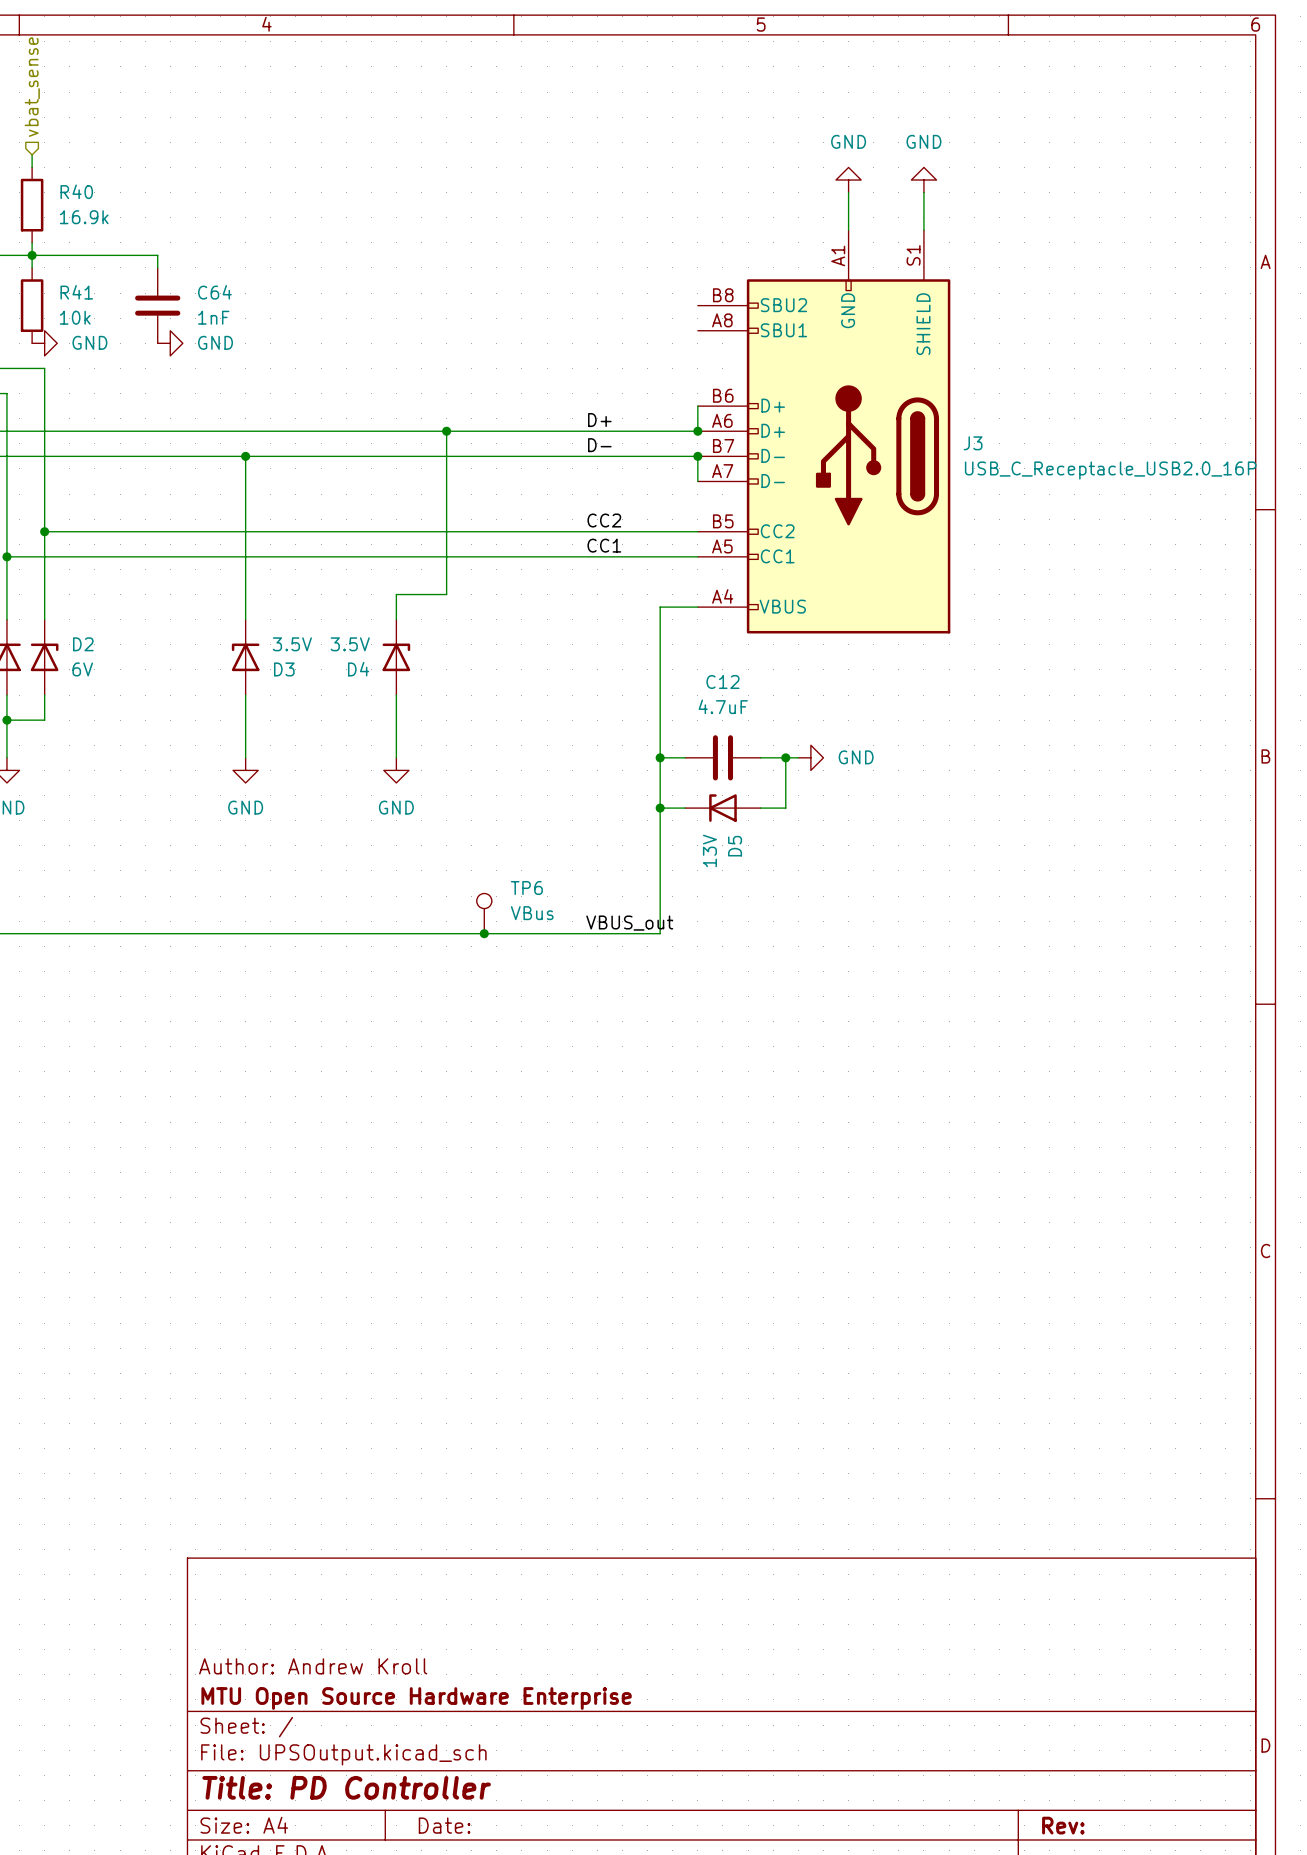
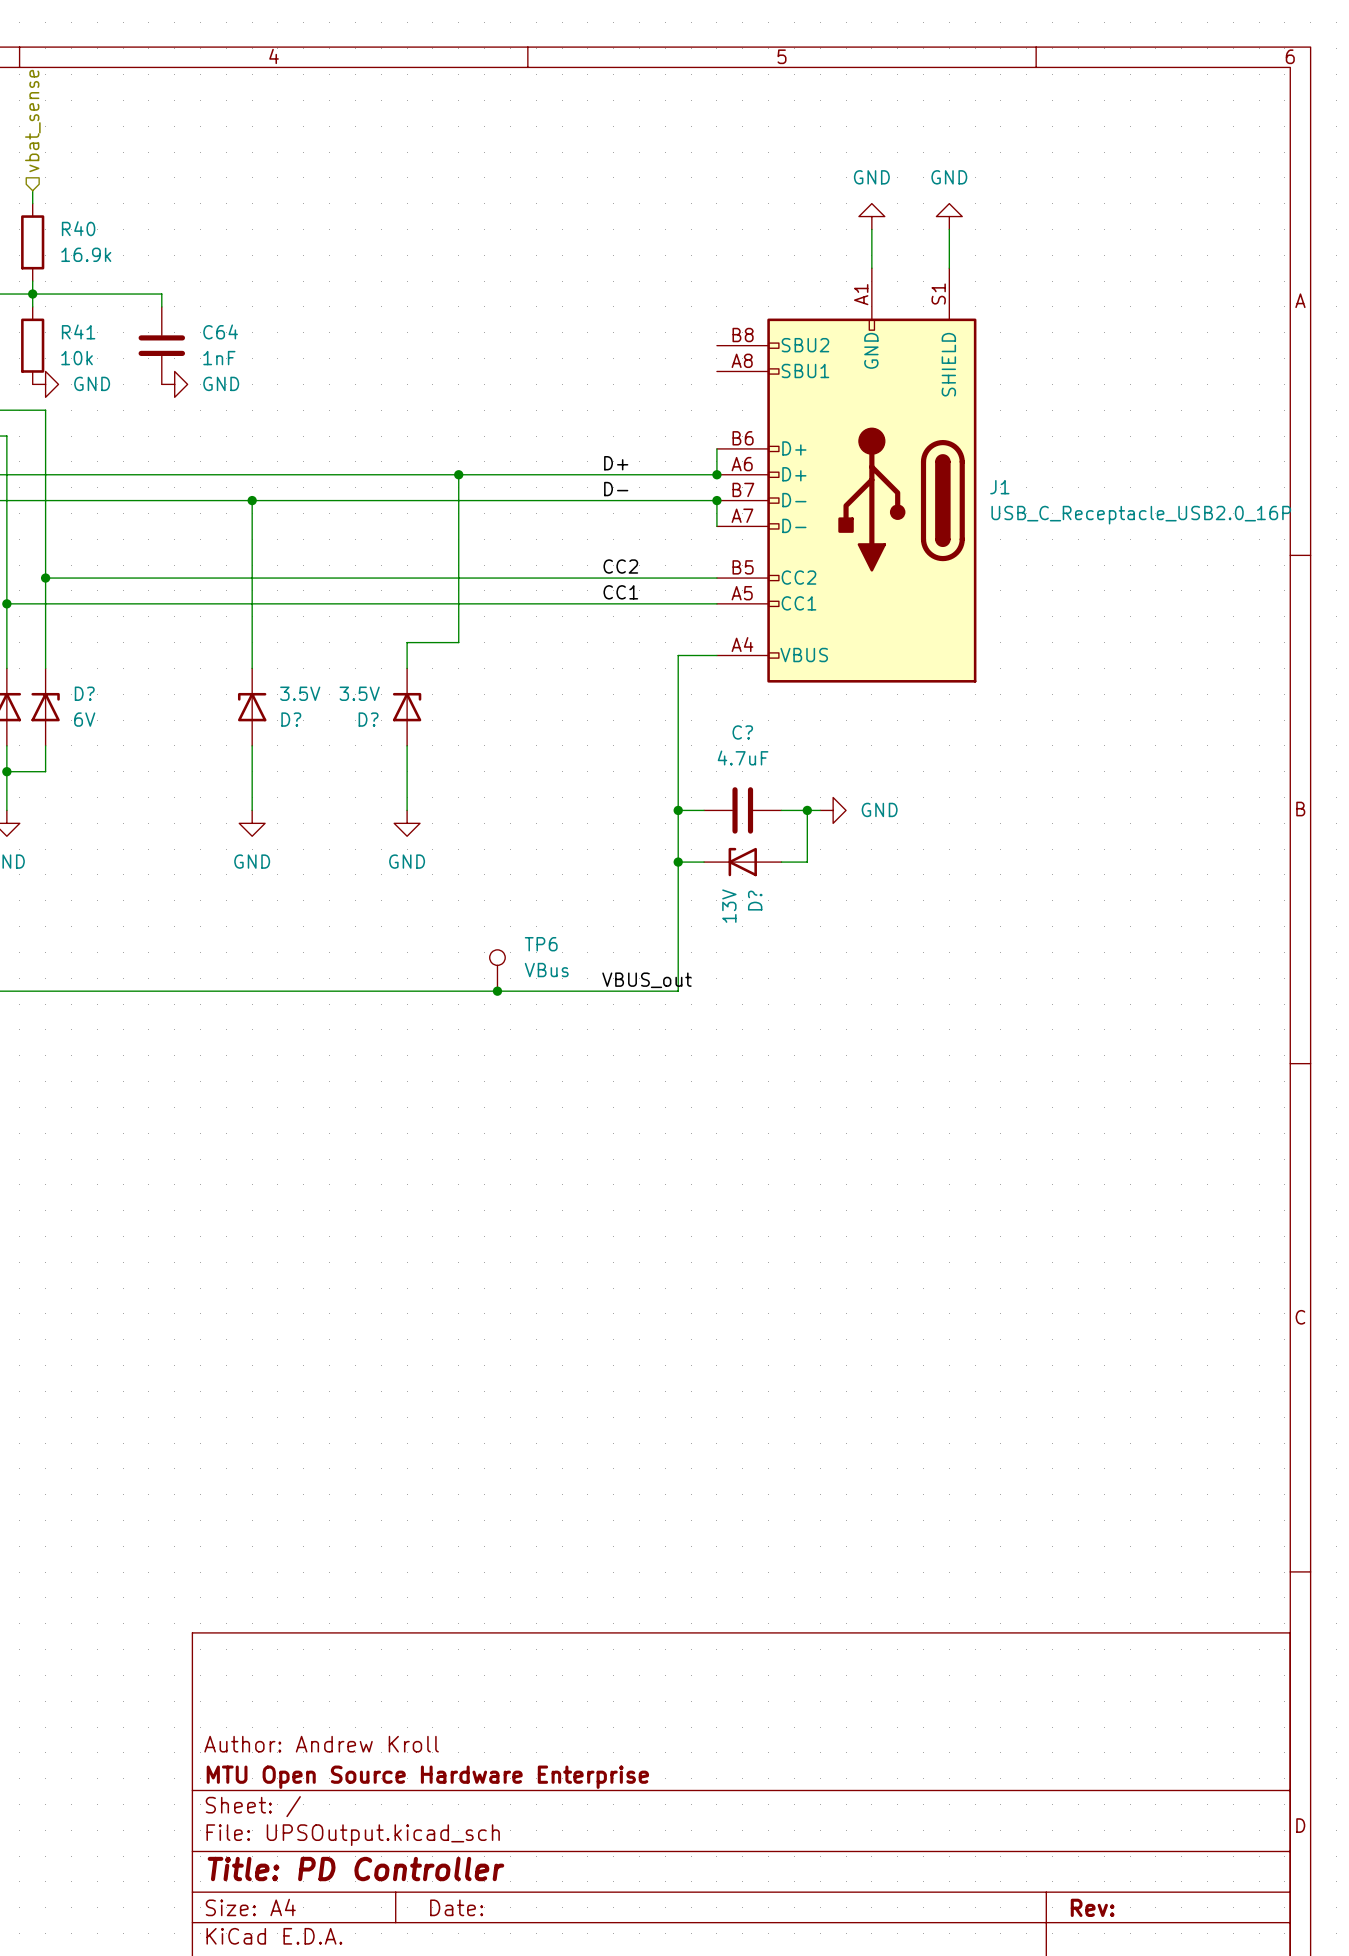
J3 name: J3 (973, 443) -> J1 (999, 487)
D2 name: D2 (83, 644) -> D? (84, 693)
D3 name: D3 (284, 669) -> D? (291, 719)
D4 name: D4 (358, 669) -> D? (368, 719)
C12 name: C12 (722, 681) -> C? (742, 732)
D5 name: D5 (735, 846) -> D? (755, 900)

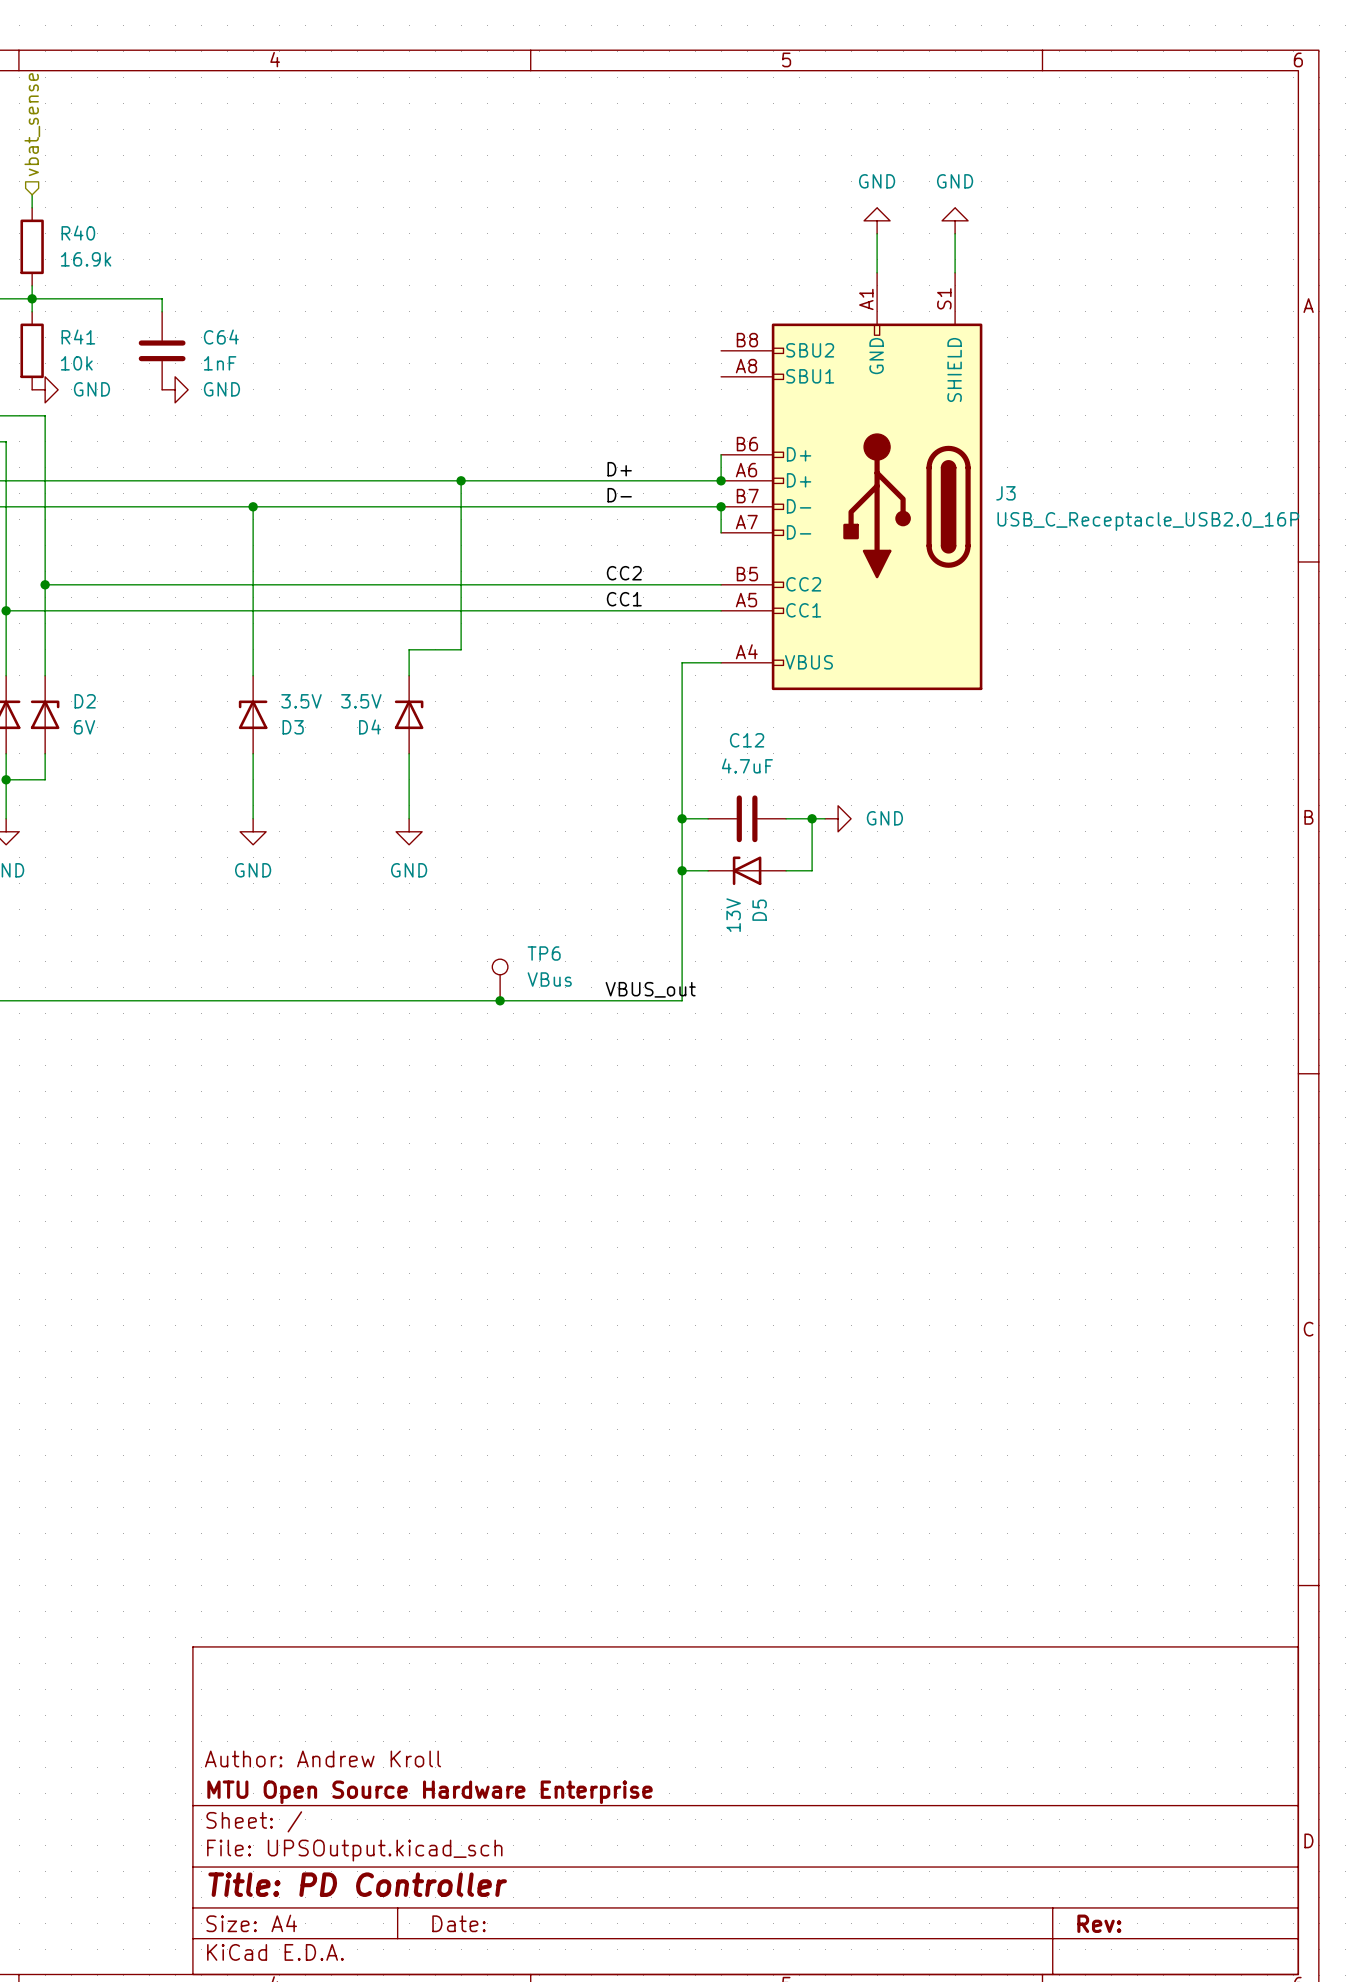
J1 name: J1 (999, 487) -> J3 (1005, 493)
D? name: D? (84, 693) -> D2 (85, 701)
D? name: D? (291, 719) -> D3 (293, 727)
D? name: D? (368, 719) -> D4 (370, 727)
C? name: C? (742, 732) -> C12 (747, 740)
D? name: D? (755, 900) -> D5 (759, 910)

